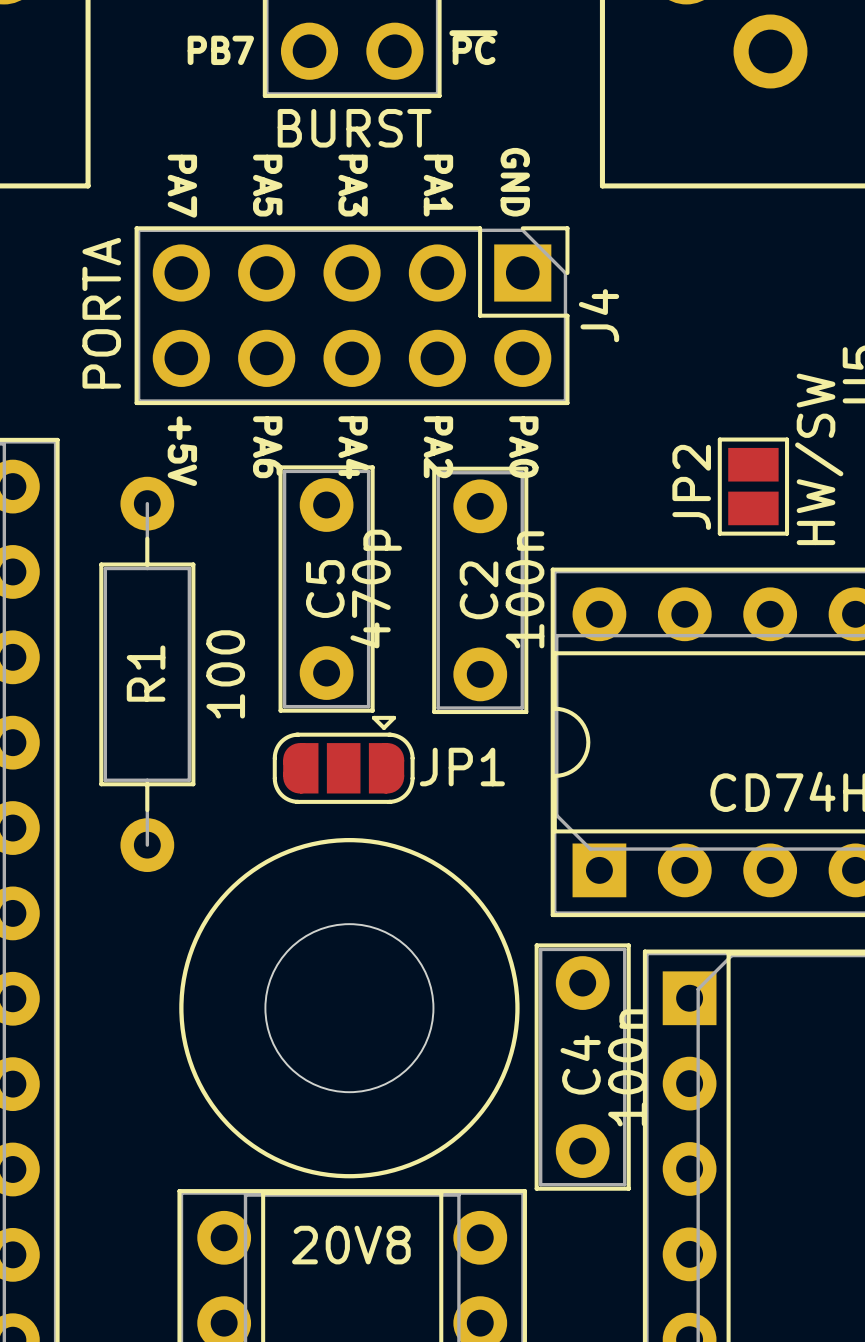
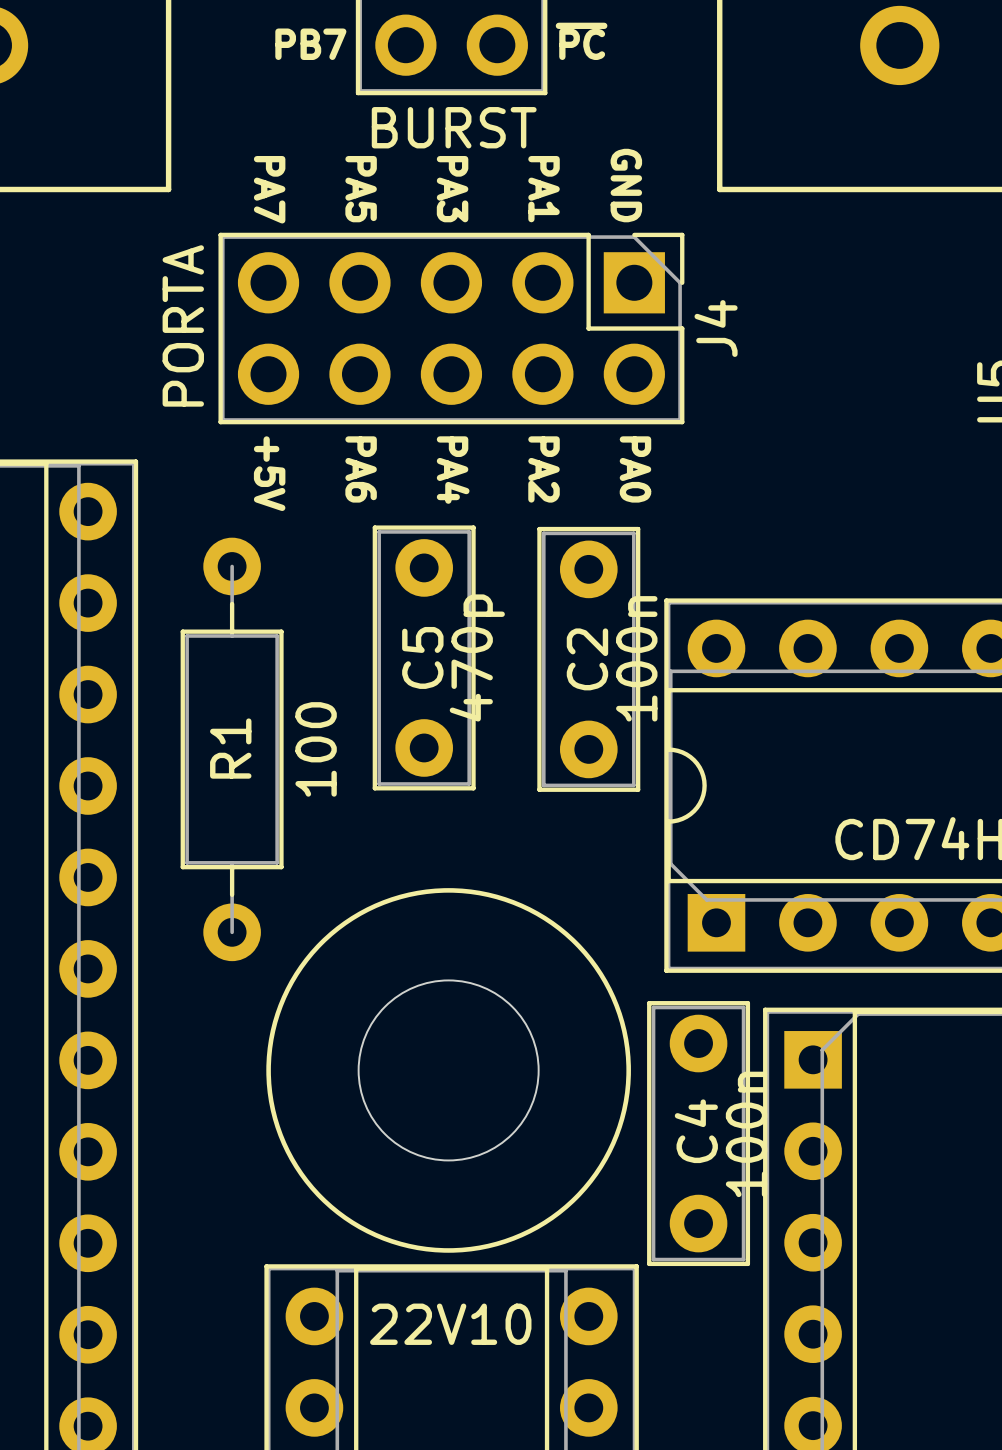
JP2: HW/SW (753, 486) -> none
C5 position: (326, 589) -> (424, 657)
C2 position: (480, 590) -> (588, 659)
R1 position: (147, 674) -> (232, 749)
JP1: (343, 759) -> none
part value: 20V8 (351, 1245) -> 22V10 (450, 1324)

